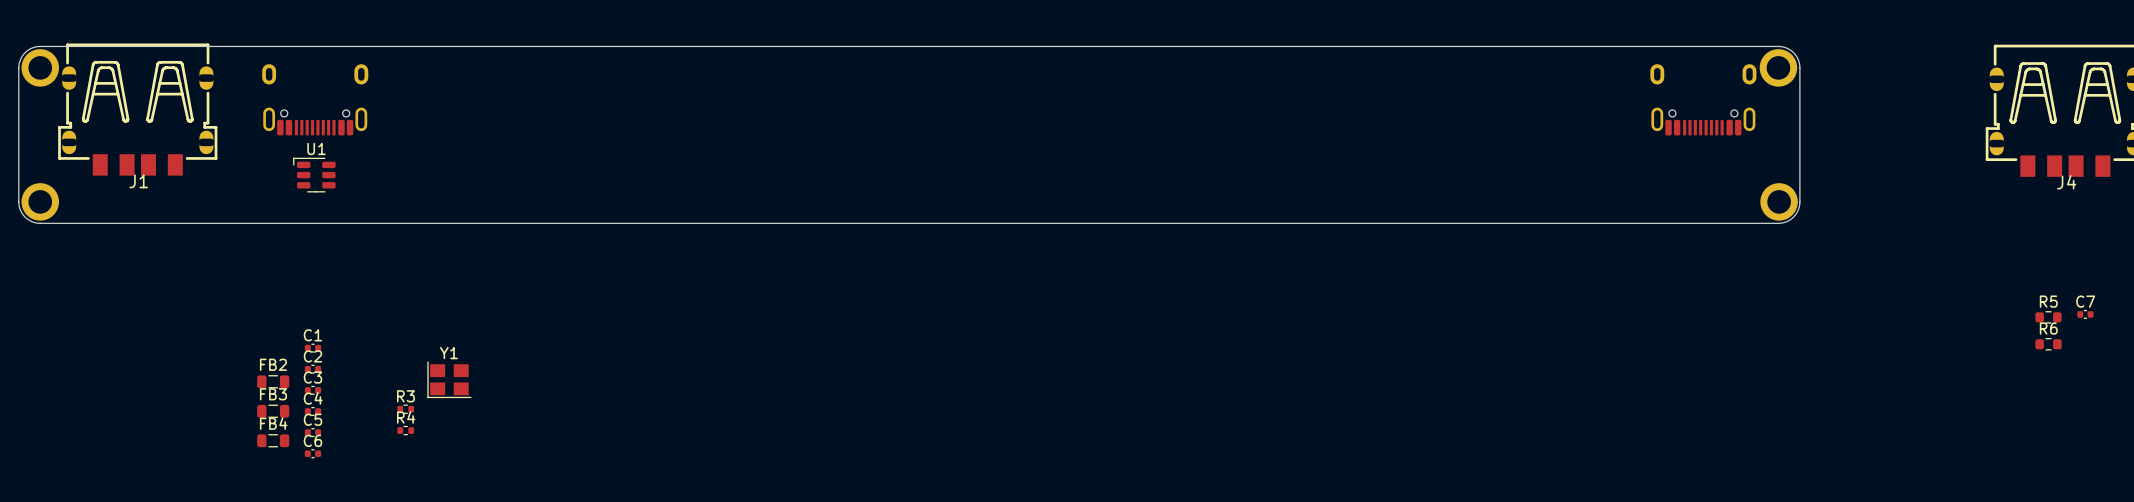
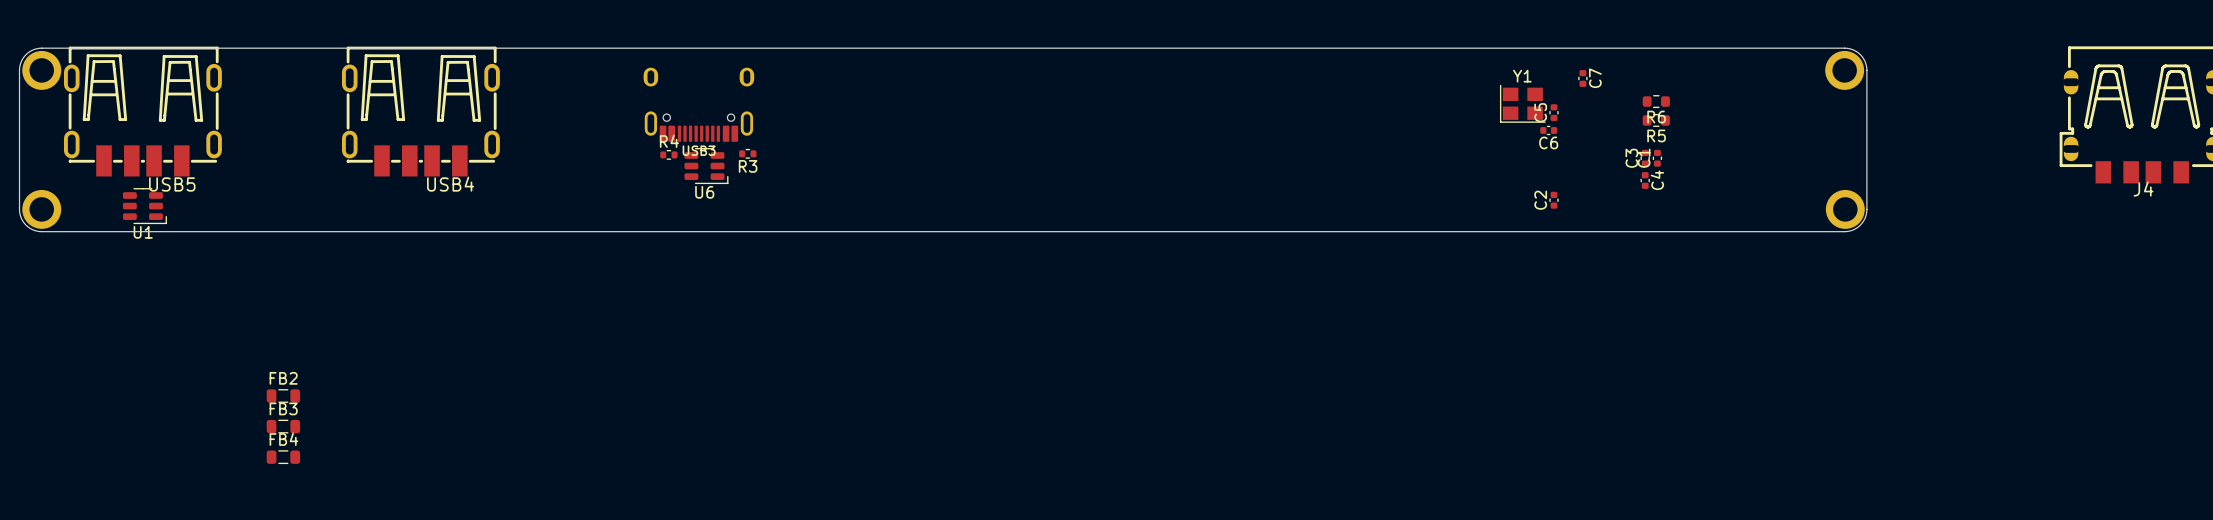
part: (315, 99) -> none
part: (1703, 99) -> none
USB3: none -> (698, 104)
USB5: none -> (142, 111)
USB4: none -> (420, 111)
J1: (137, 109) -> none
U6: none -> (706, 166)
U1 rotation: 0° (314, 175) -> 180° (144, 206)
U1 position: (314, 175) -> (144, 206)
R5 name position: R5 (2048, 301) -> R5 (1656, 135)
C7 rotation: 0° (2085, 314) -> 90° clockwise (1582, 78)
C7 position: (2085, 314) -> (1582, 78)
R5 position: (2048, 317) -> (1656, 120)
R6 name position: R6 (2048, 328) -> R6 (1656, 117)
R6 position: (2048, 344) -> (1656, 101)
C1 rotation: 0° (312, 348) -> 90° clockwise (1657, 158)
C1 position: (312, 348) -> (1657, 158)
C2 rotation: 0° (312, 369) -> 90° clockwise (1554, 200)
C2 position: (312, 369) -> (1554, 200)
Y1 position: (449, 379) -> (1522, 103)
C3 rotation: 0° (312, 390) -> 90° clockwise (1645, 158)
C3 position: (312, 390) -> (1645, 158)
R3 name position: R3 (405, 396) -> R3 (748, 166)
R3 position: (405, 409) -> (747, 153)
C4 rotation: 0° (312, 411) -> 90° clockwise (1645, 180)
C4 position: (312, 411) -> (1645, 180)
R4 position: (405, 430) -> (668, 154)
C5 rotation: 0° (312, 432) -> 90° clockwise (1554, 112)
C5 position: (312, 432) -> (1554, 112)
C6 name position: C6 (312, 440) -> C6 (1548, 142)
C6 position: (312, 453) -> (1548, 130)

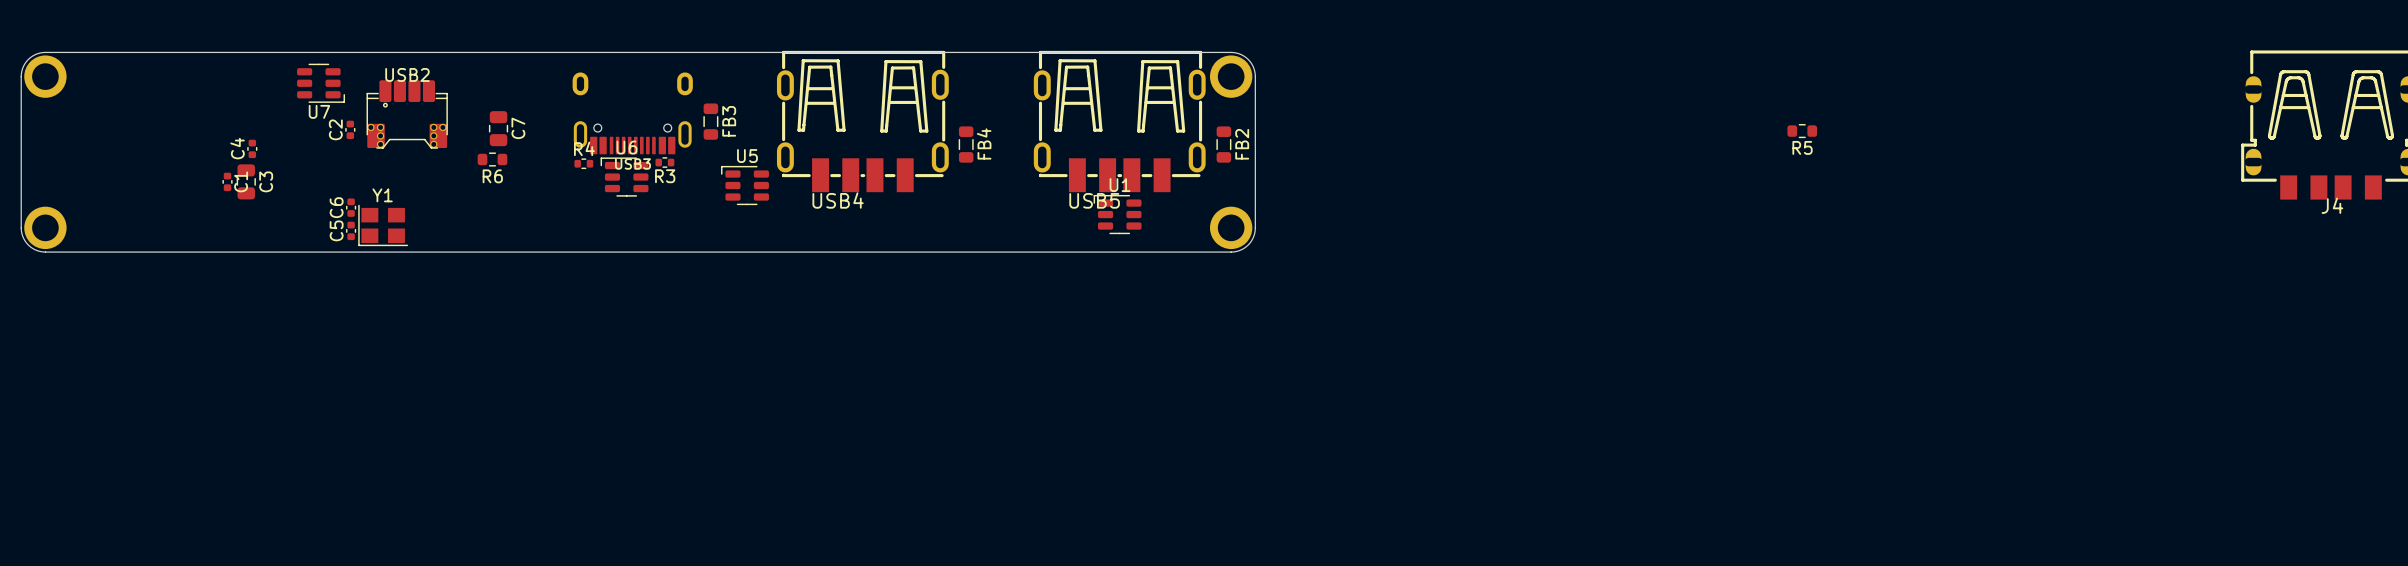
board edge: (1131, 48) (1844, 48) (1854, 50) (1860, 54) (1865, 63) (1866, 70) (1866, 211) (1860, 225) (1849, 231) (1131, 231) -> (1231, 52) (1239, 53) (1248, 59) (1252, 66) (1255, 76) (1255, 230) (1252, 238) (1246, 246) (1231, 252)
USB3 footprint: [643, 67, 755, 142] -> [572, 72, 693, 155]
part: none -> (1231, 76)
C7 footprint: [1578, 70, 1588, 87] -> [488, 111, 509, 147]
part: (1844, 70) -> none
U7: none -> (321, 83)
R6 position: (1656, 101) -> (492, 159)
Y1 position: (1522, 103) -> (383, 225)
USB2: none -> (407, 114)
USB5 position: (142, 111) -> (1119, 121)
USB4 position: (420, 111) -> (862, 121)
C5 position: (1554, 112) -> (351, 230)
C6 rotation: 0° (1548, 130) -> 90° clockwise (351, 207)
C6 position: (1548, 130) -> (351, 207)
C3 footprint: [1640, 149, 1650, 167] -> [236, 164, 256, 200]
R3 position: (747, 153) -> (664, 162)
R4 position: (668, 154) -> (583, 163)
C3 name position: C3 (1631, 158) -> C3 (266, 181)
C1 name position: C1 (1644, 158) -> C1 (241, 181)
C1 position: (1657, 158) -> (227, 181)
U6 rotation: 0° (706, 166) -> 180° (624, 177)
U6 position: (706, 166) -> (624, 177)
U5: none -> (745, 185)
C4 position: (1645, 180) -> (252, 148)
C4 name position: C4 (1657, 180) -> C4 (237, 148)
USB5 name position: USB5 (172, 184) -> USB5 (1094, 200)
USB4 name position: USB4 (450, 184) -> USB4 (838, 200)
C2 position: (1554, 200) -> (350, 129)
U1 rotation: 0° (144, 206) -> 180° (1117, 214)
U1 position: (144, 206) -> (1117, 214)
part: none -> (1231, 227)
part: (1845, 209) -> none
FB2 rotation: 0° (283, 396) -> 90° clockwise (1223, 144)
FB2 position: (283, 396) -> (1223, 144)
FB3 rotation: 0° (283, 426) -> 90° clockwise (710, 121)
FB3 position: (283, 426) -> (710, 121)
FB4 rotation: 0° (283, 457) -> 90° clockwise (966, 144)
FB4 position: (283, 457) -> (966, 144)

